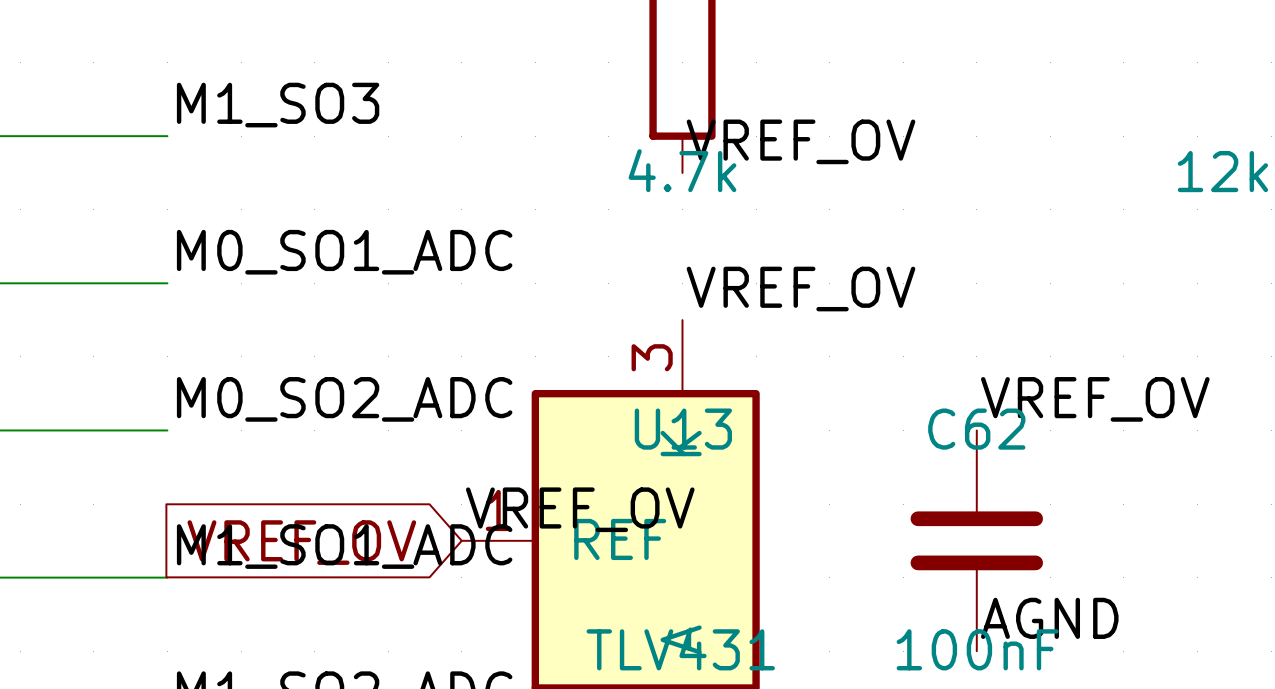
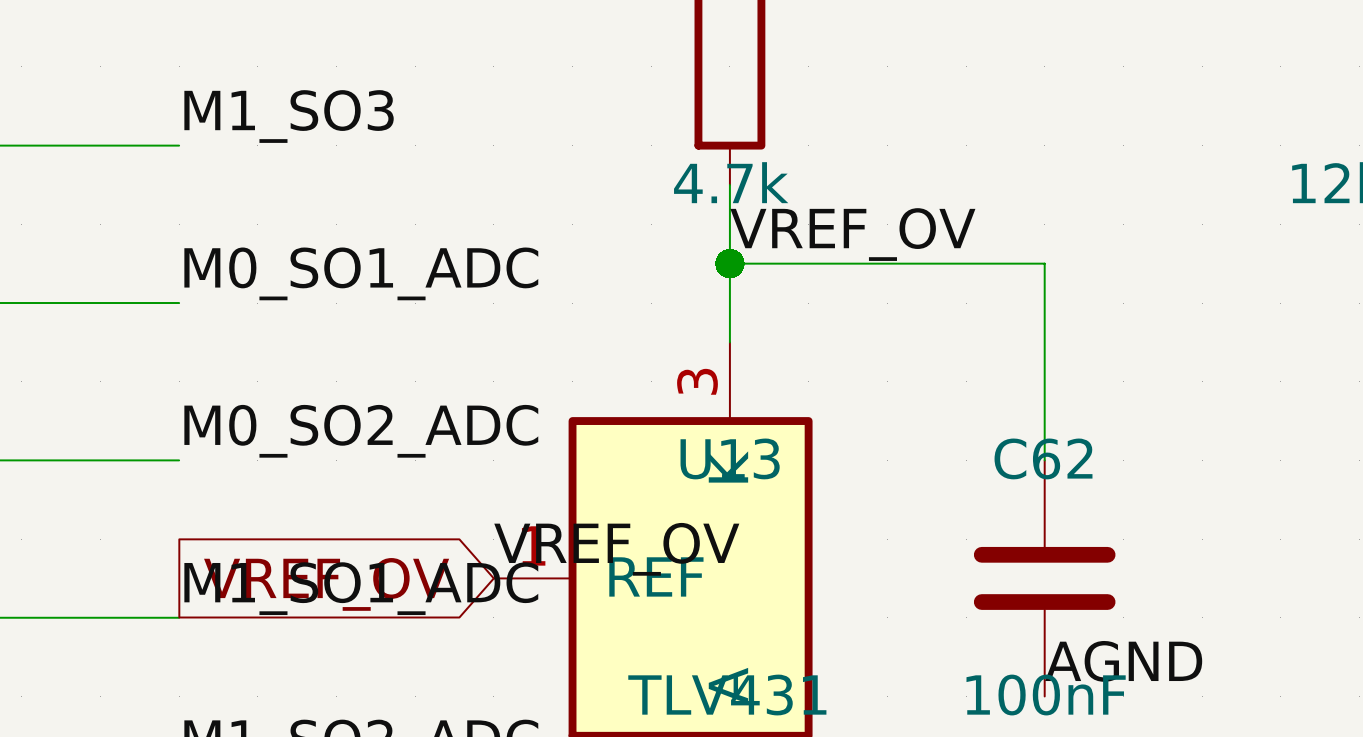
label: VREF_OV (801, 141) -> none
wire: none -> (729, 184) (729, 342)
label: none -> VREF_OV (852, 234)
wire: none -> (729, 263) (1044, 263) (1044, 460)
junction: none -> (729, 263)
label: VREF_OV (801, 289) -> none
label: VREF_OV (1095, 399) -> none

